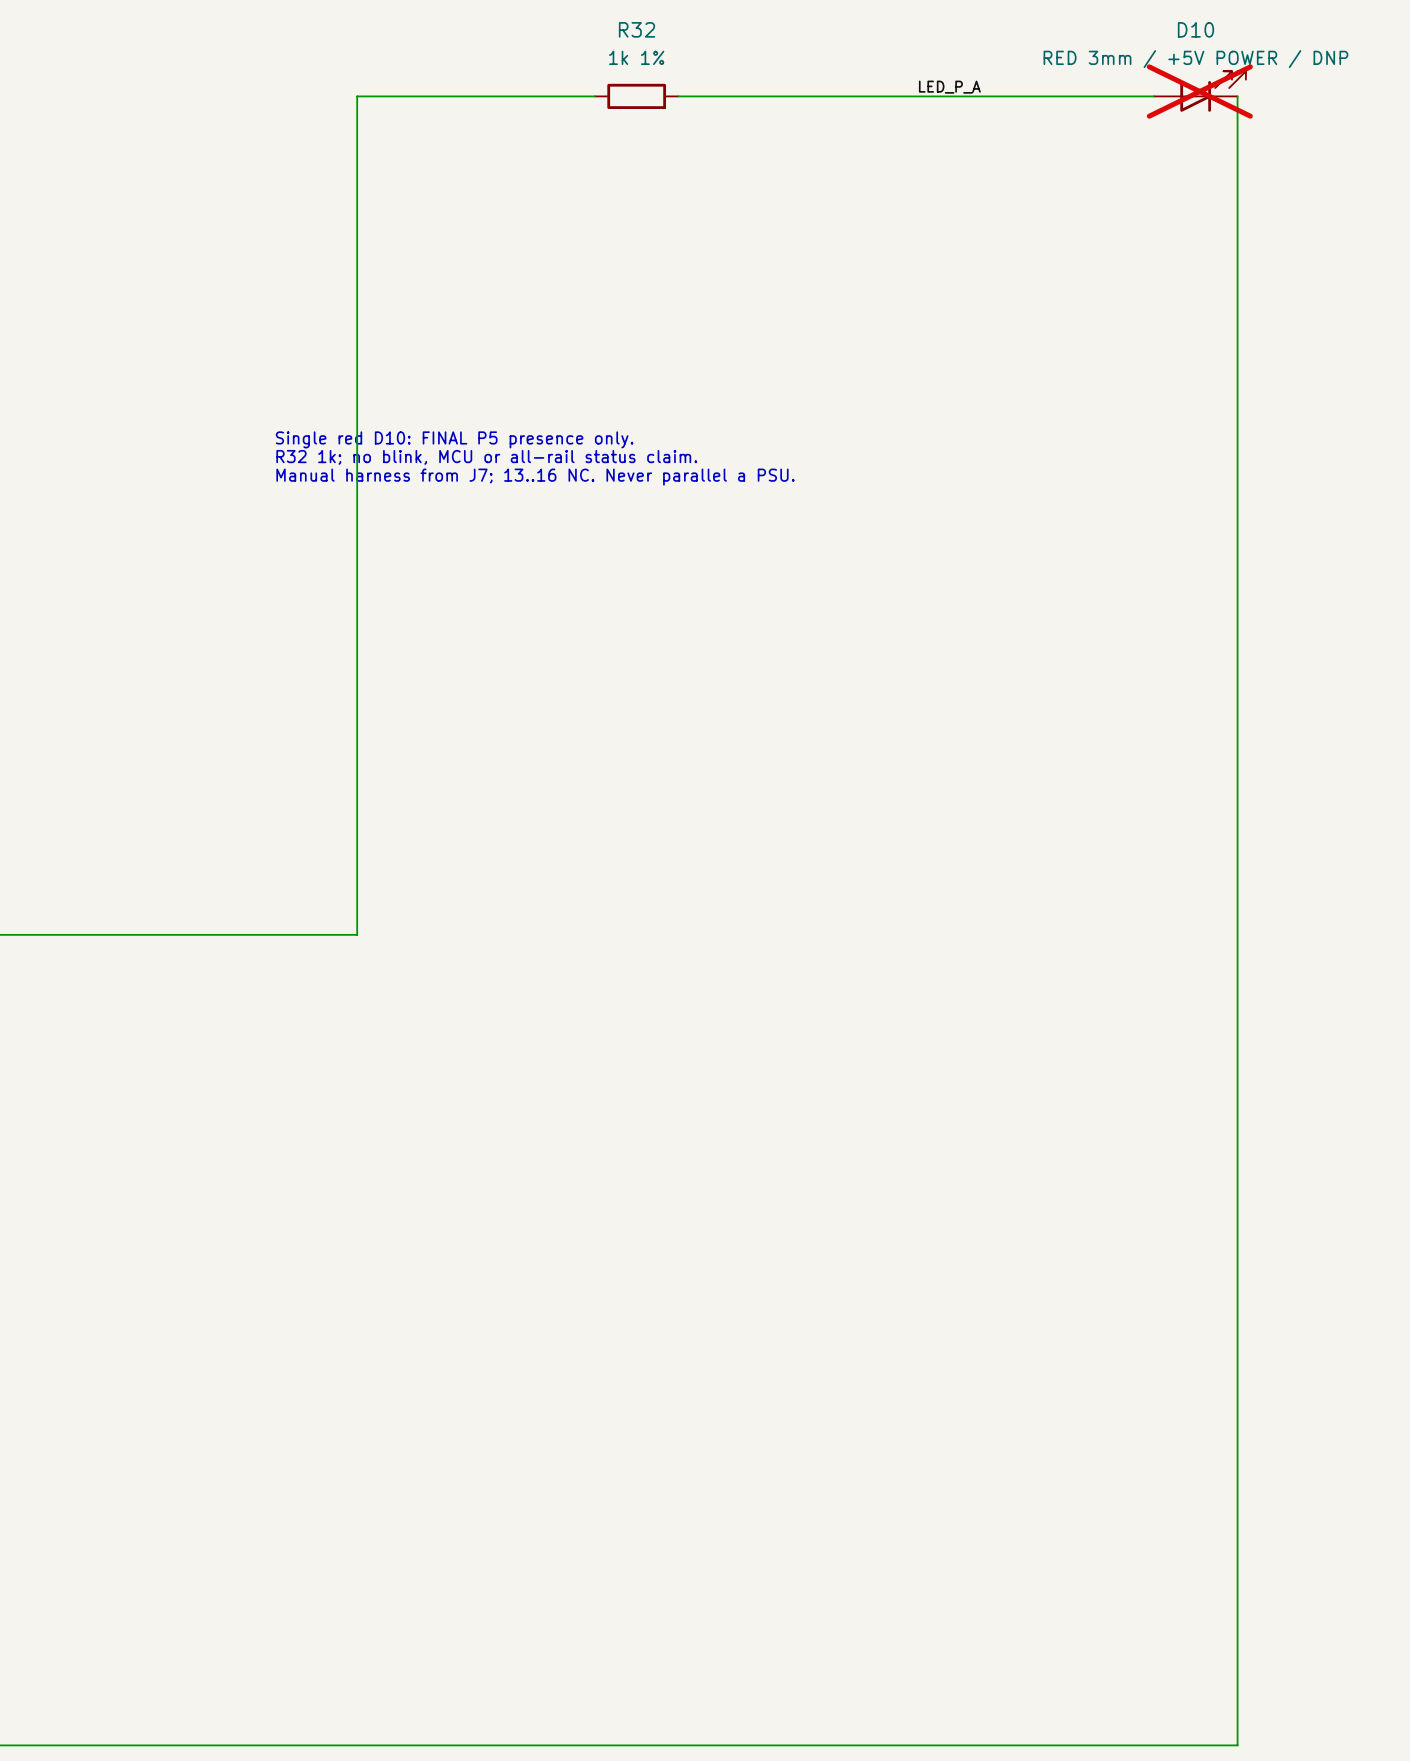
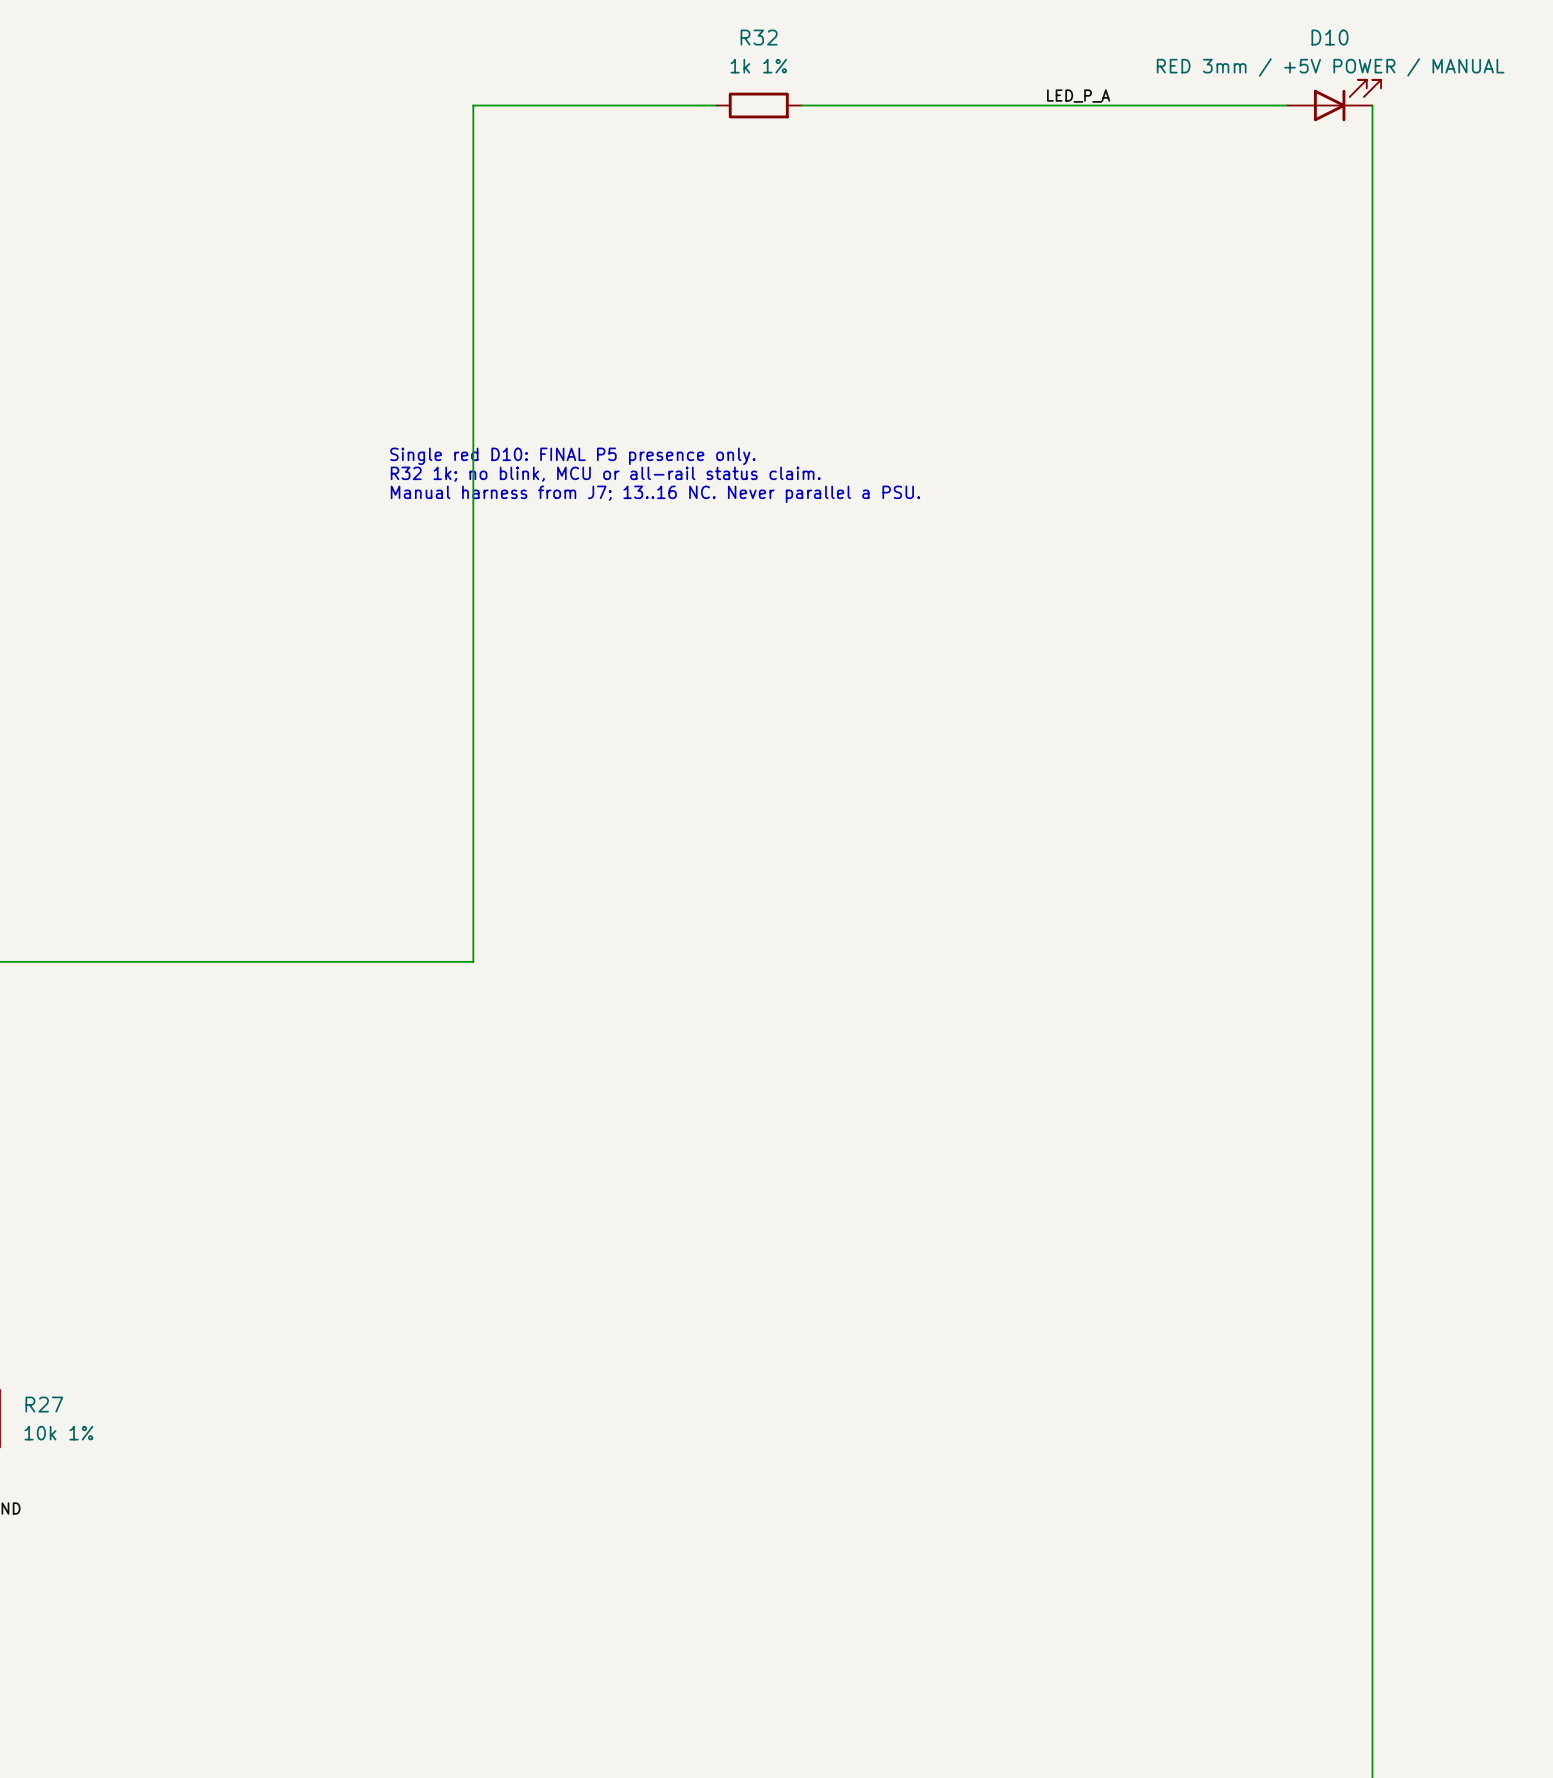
D10 value: RED 3mm / +5V POWER / DNP (1195, 59) -> RED 3mm / +5V POWER / MANUAL (1330, 67)
D10 do-not-place cross: (1199, 91) -> none

